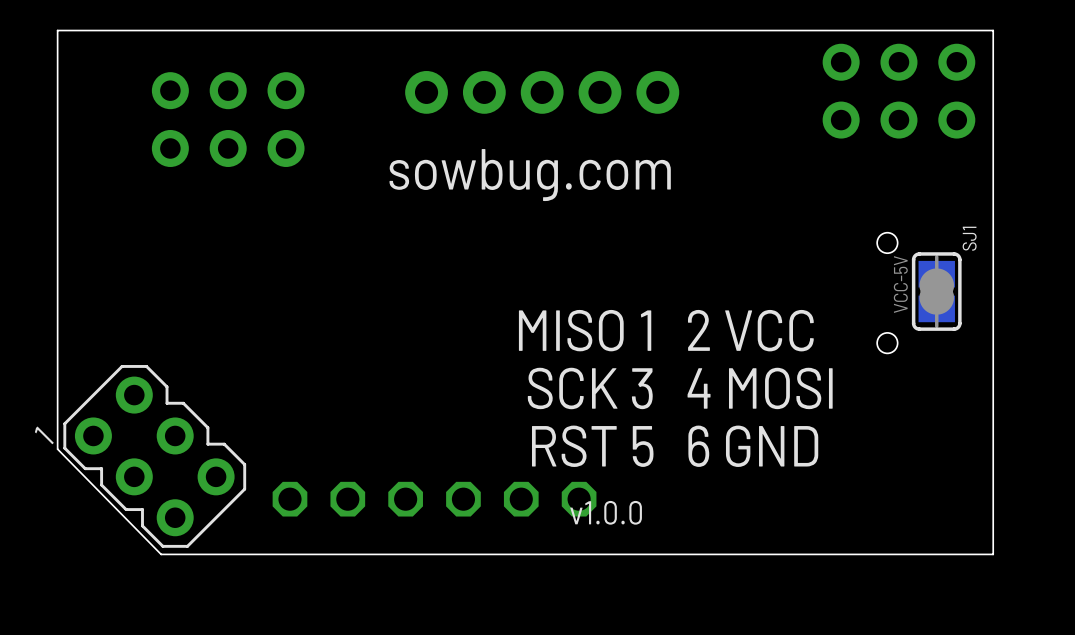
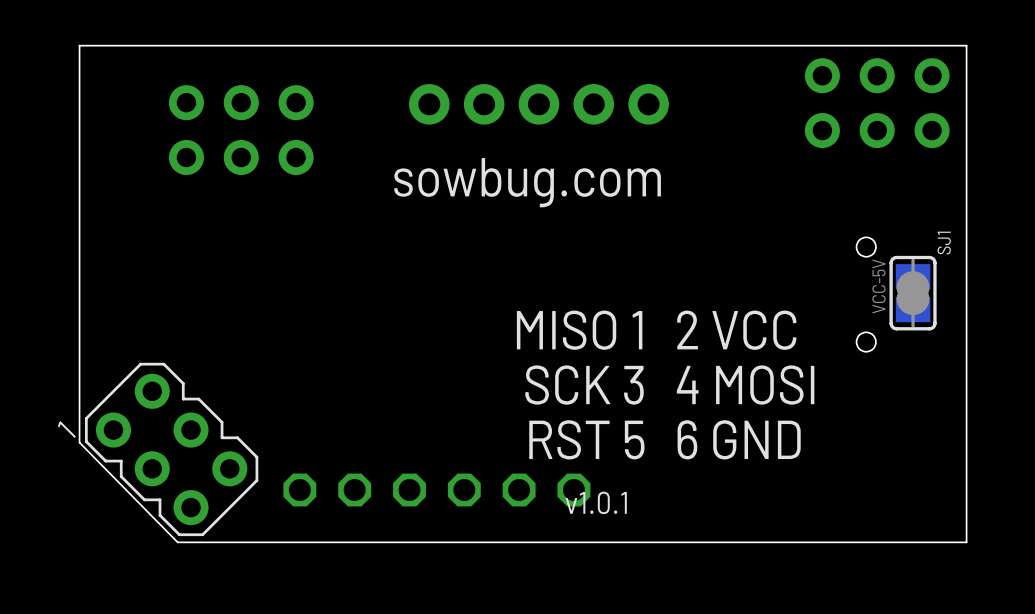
text: v1.0.0 (606, 512) -> v1.0.1 (596, 502)

